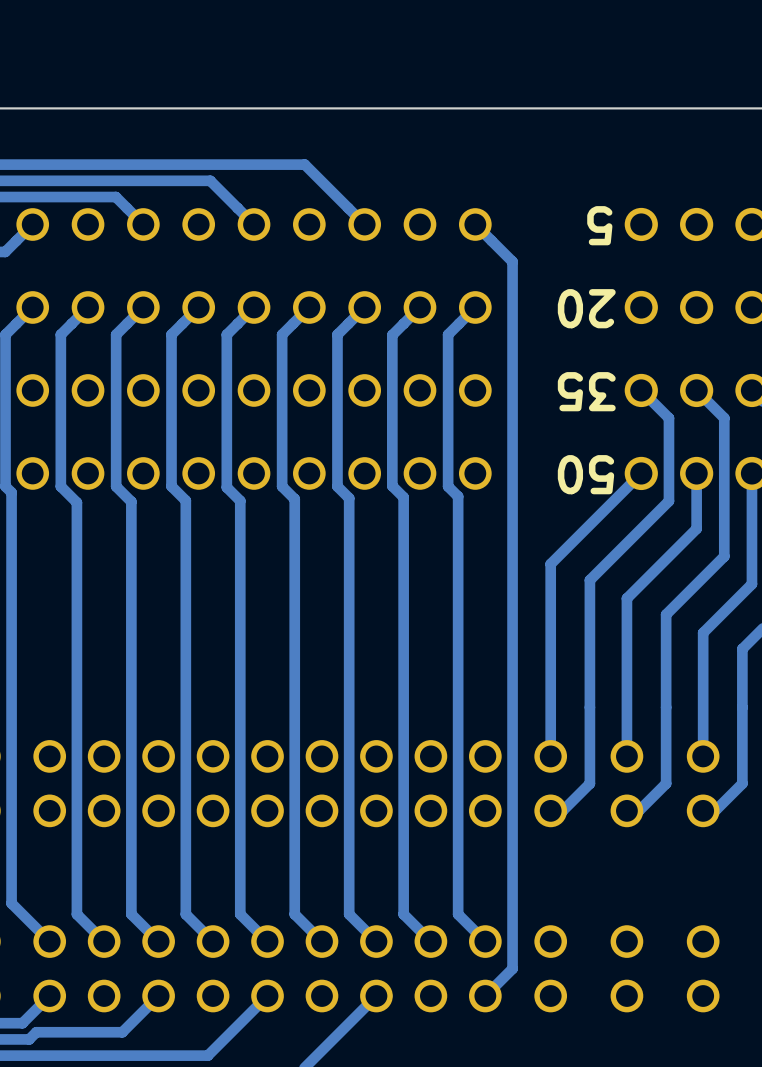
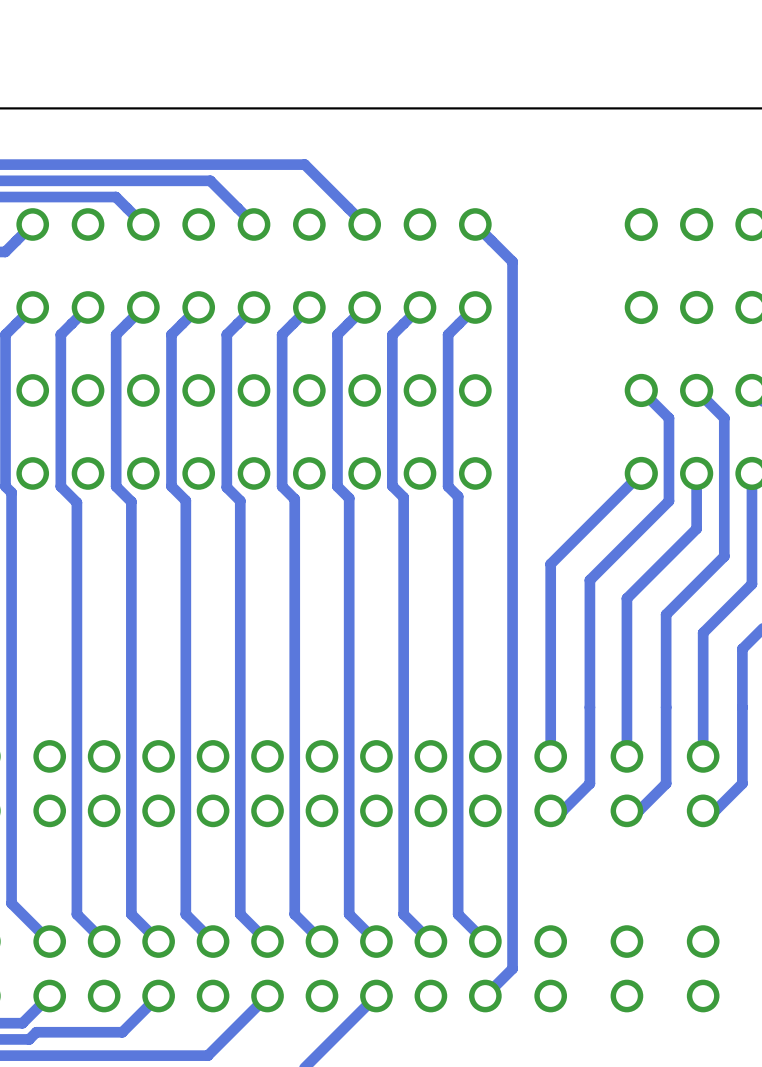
text: 5 (599, 225) -> none
text: 20 (586, 308) -> none
text: 35 (586, 391) -> none
text: 50 (585, 474) -> none

